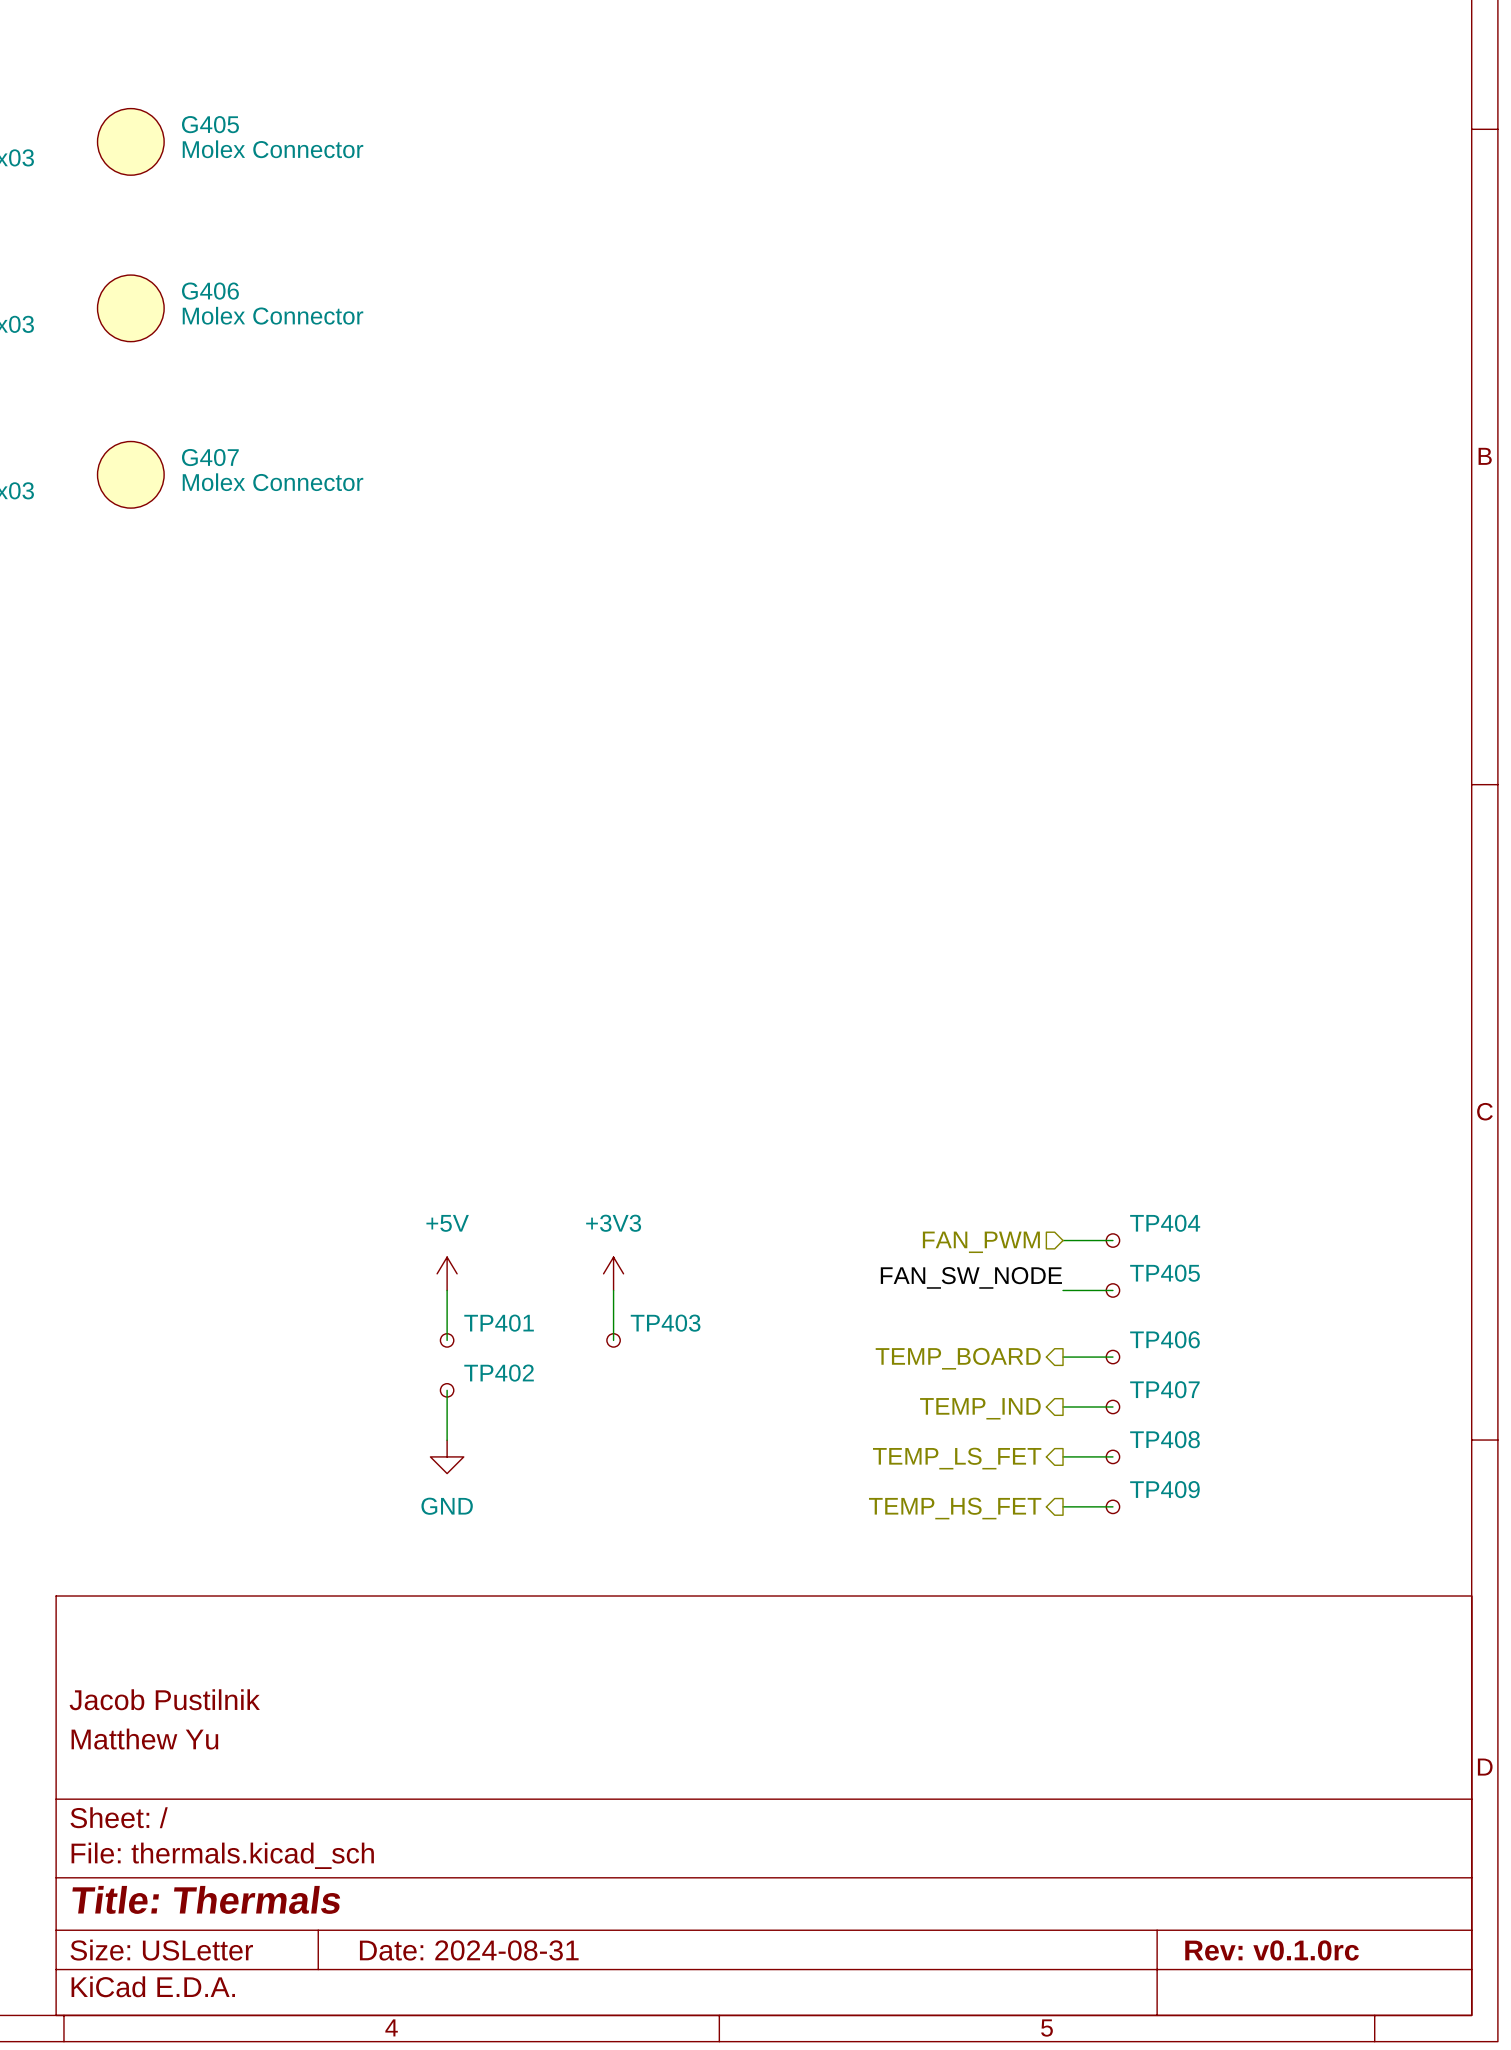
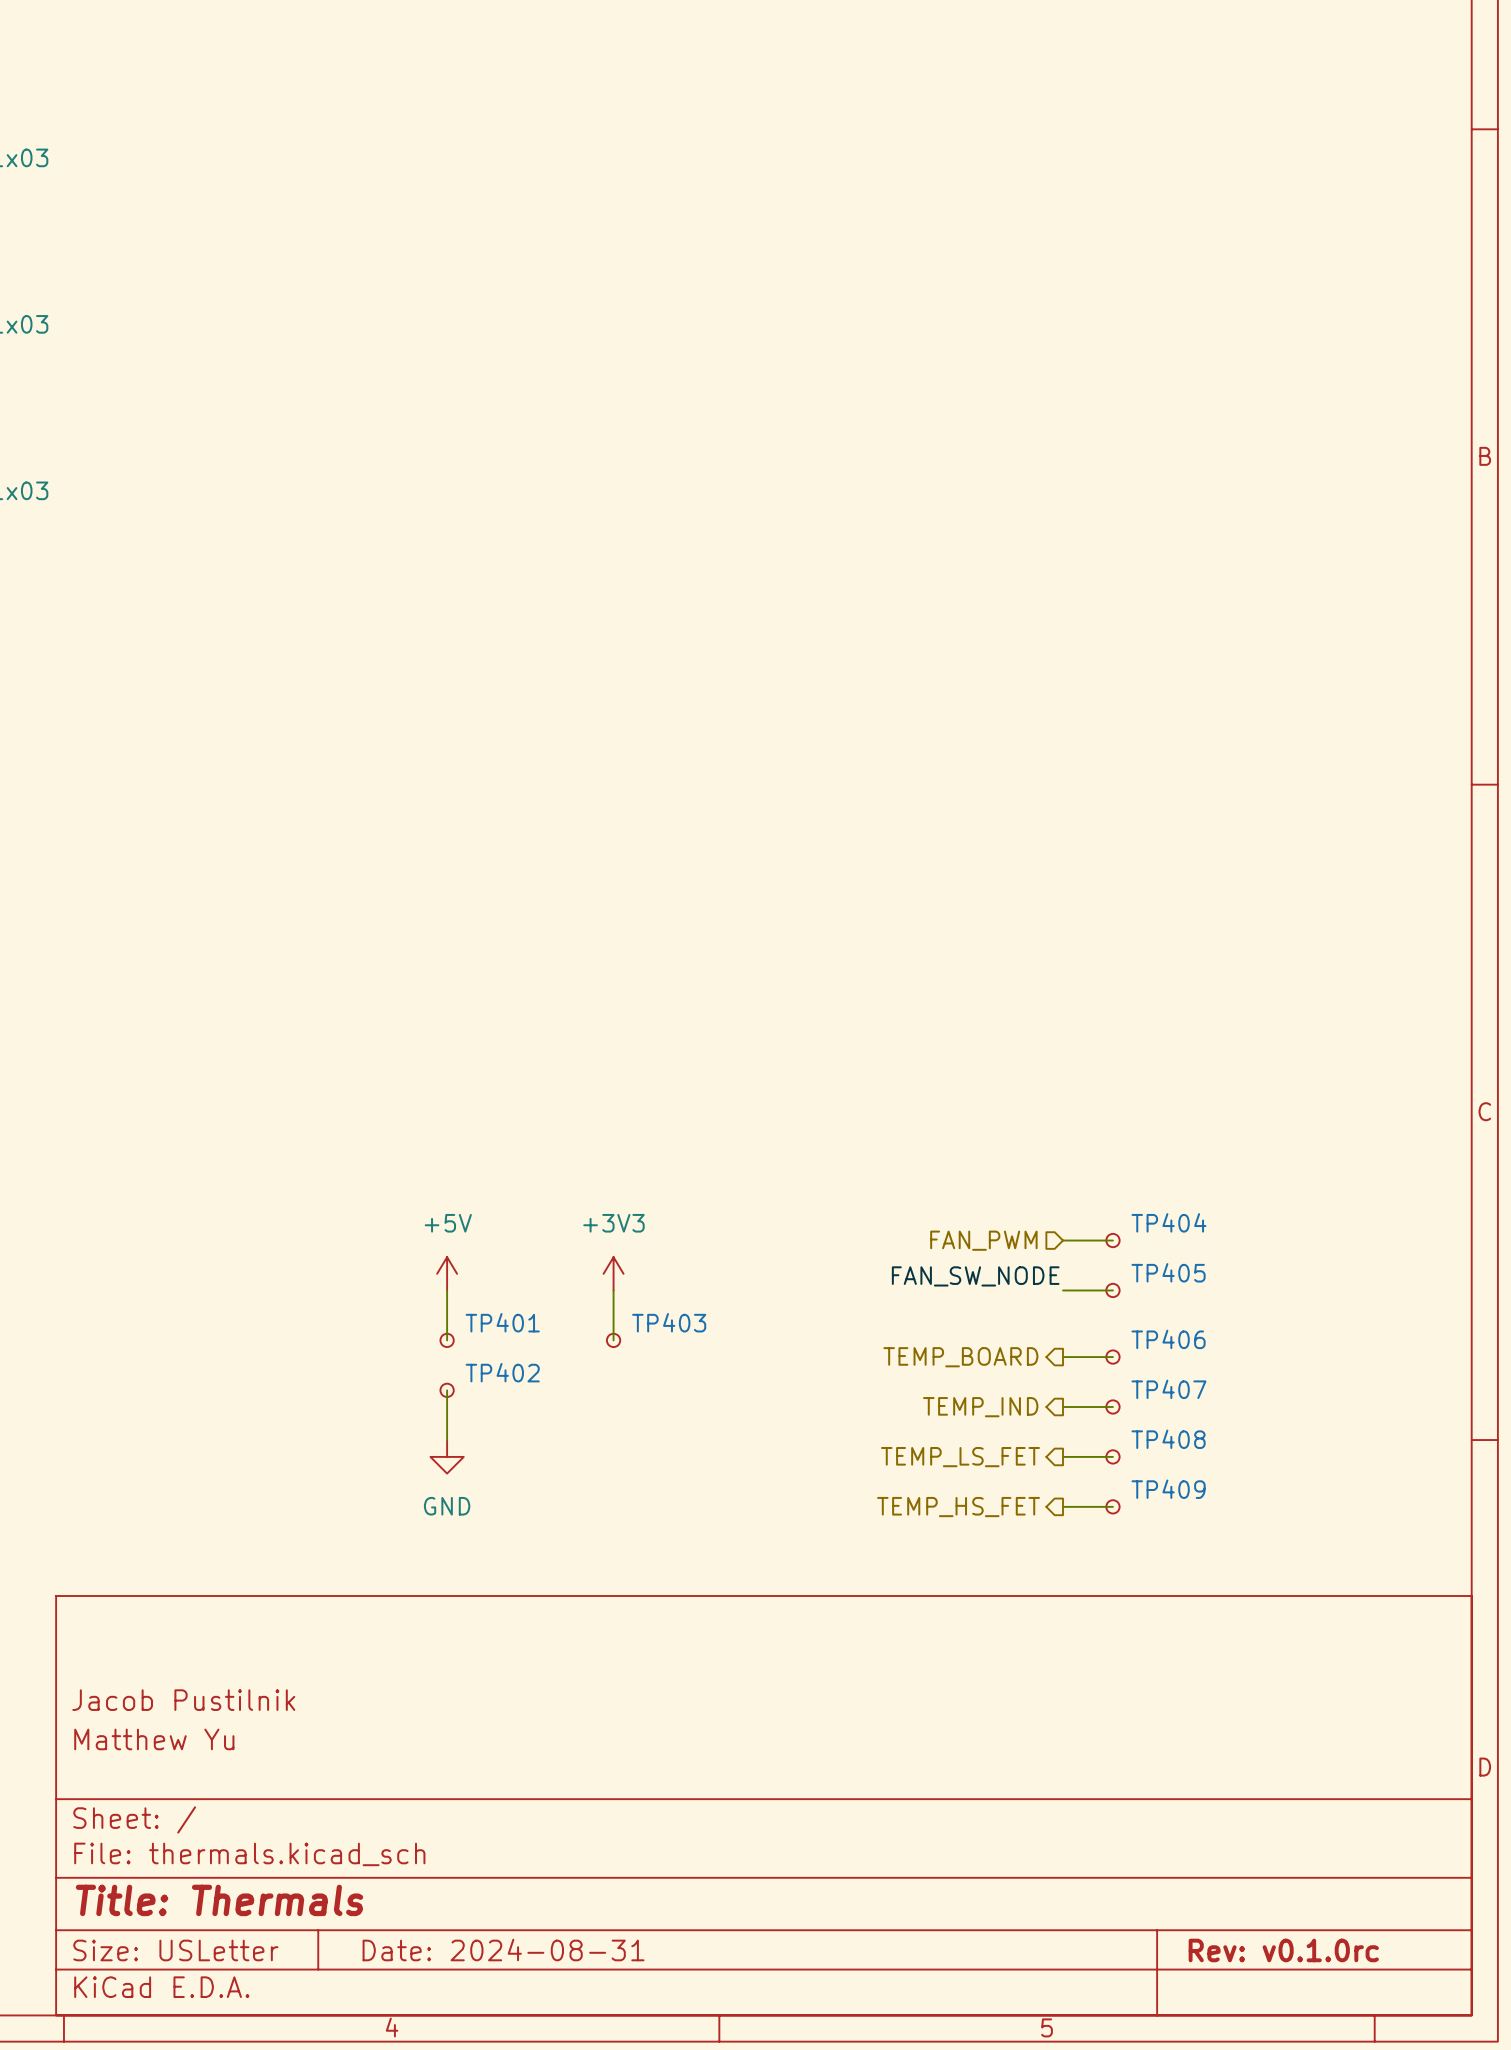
G405: Molex Connector (130, 141) -> none
G406: Molex Connector (130, 308) -> none
G407: Molex Connector (130, 474) -> none

